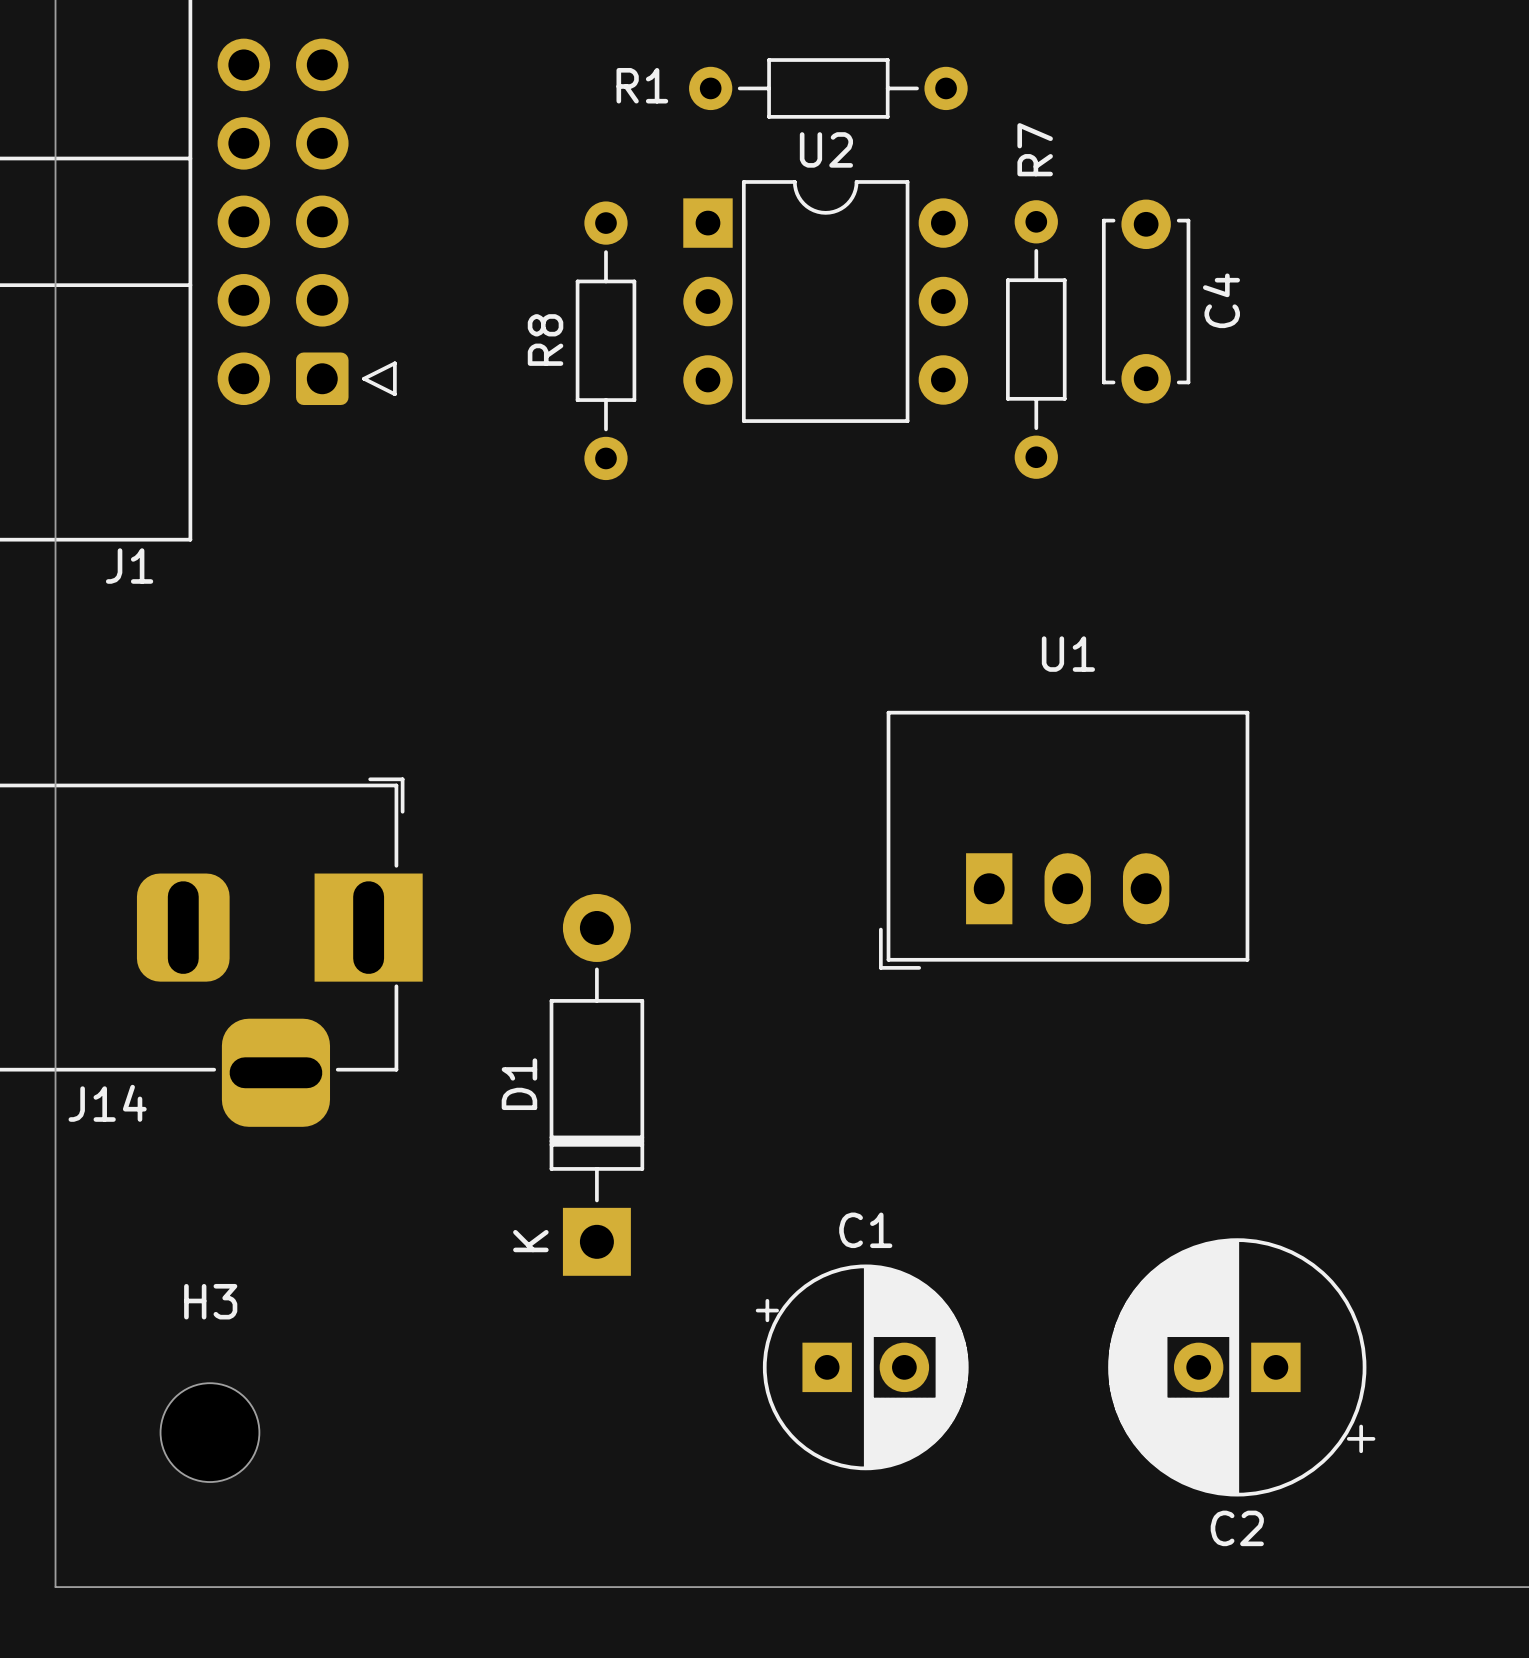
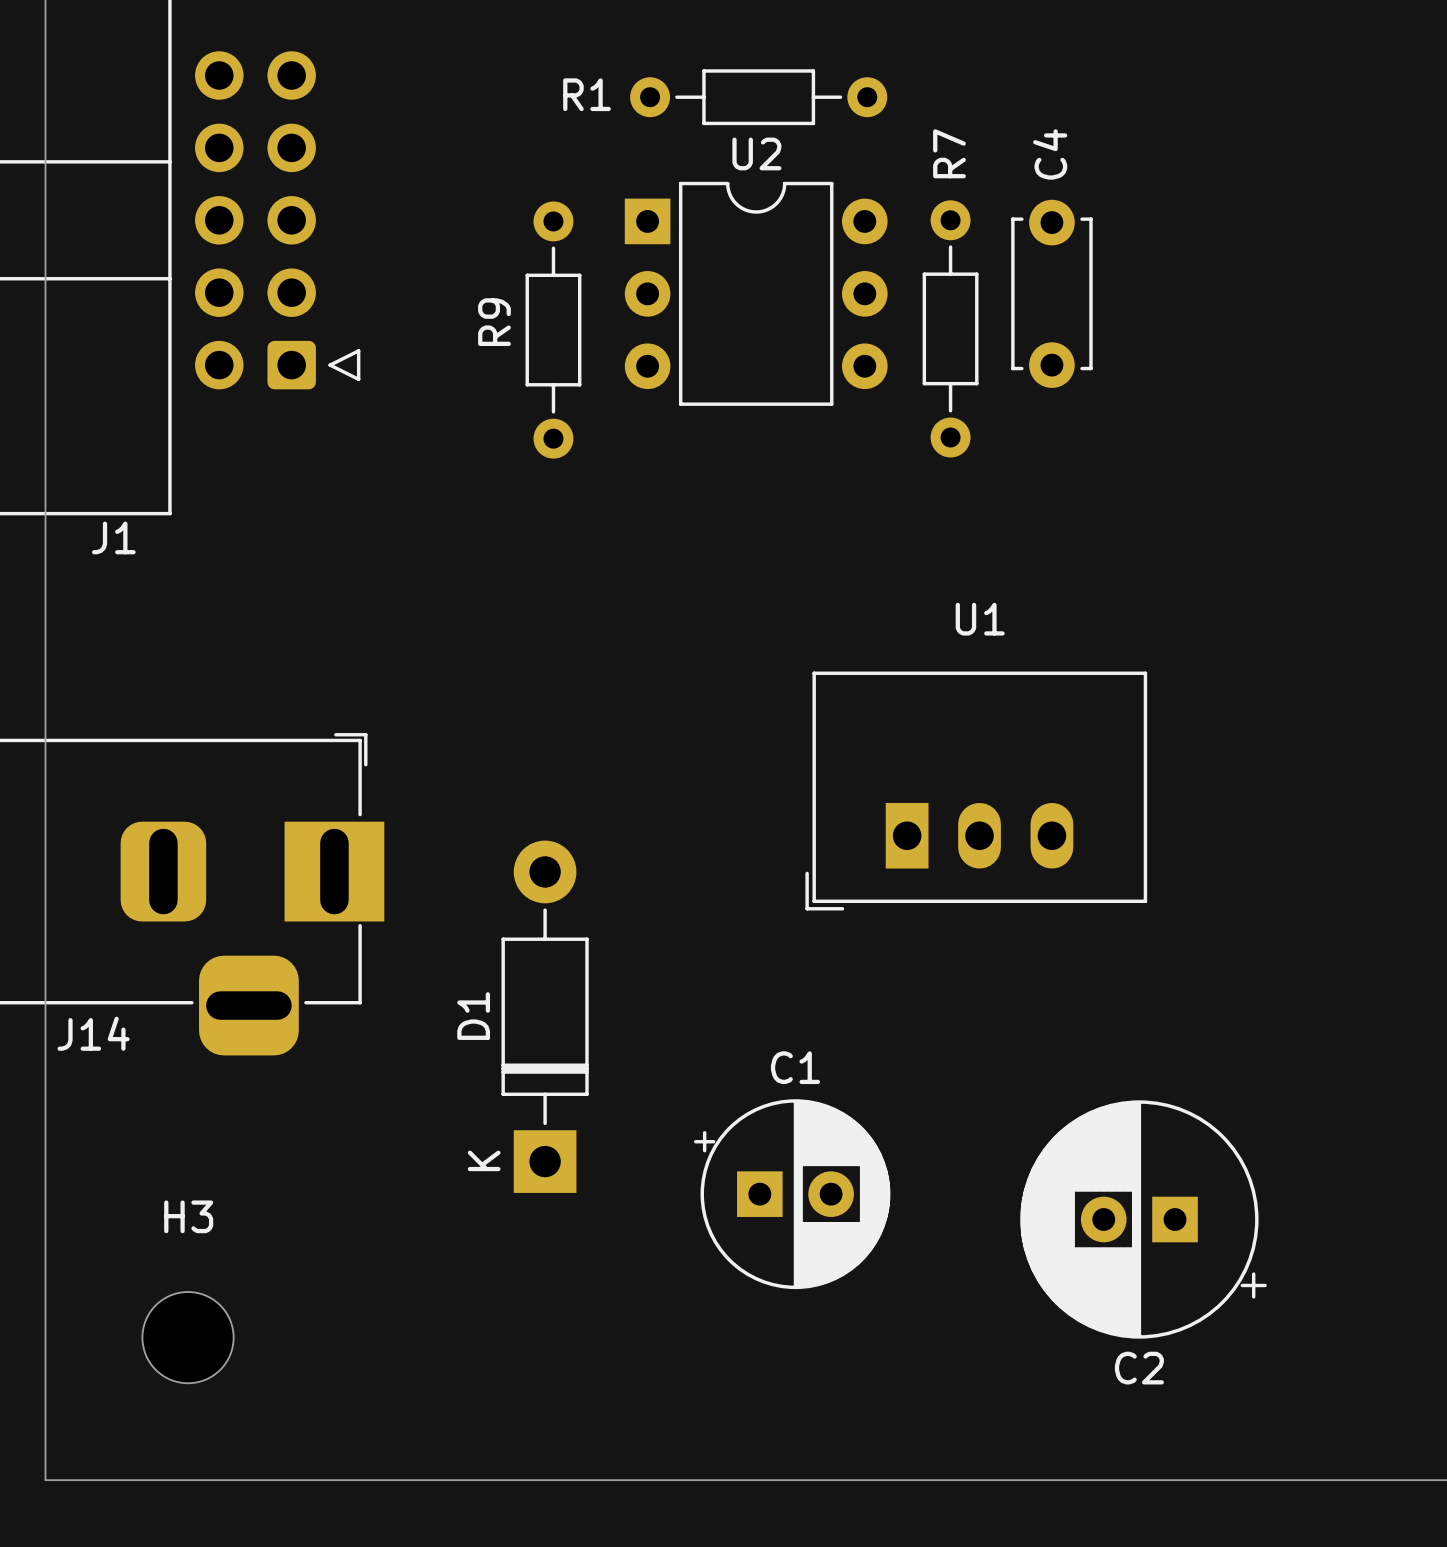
C4 name position: C4 (1221, 300) -> C4 (1050, 154)
R8 name: R8 (545, 340) -> R9 (494, 322)
C1 position: (862, 1367) -> (792, 1194)
C2 position: (1241, 1367) -> (1143, 1219)

